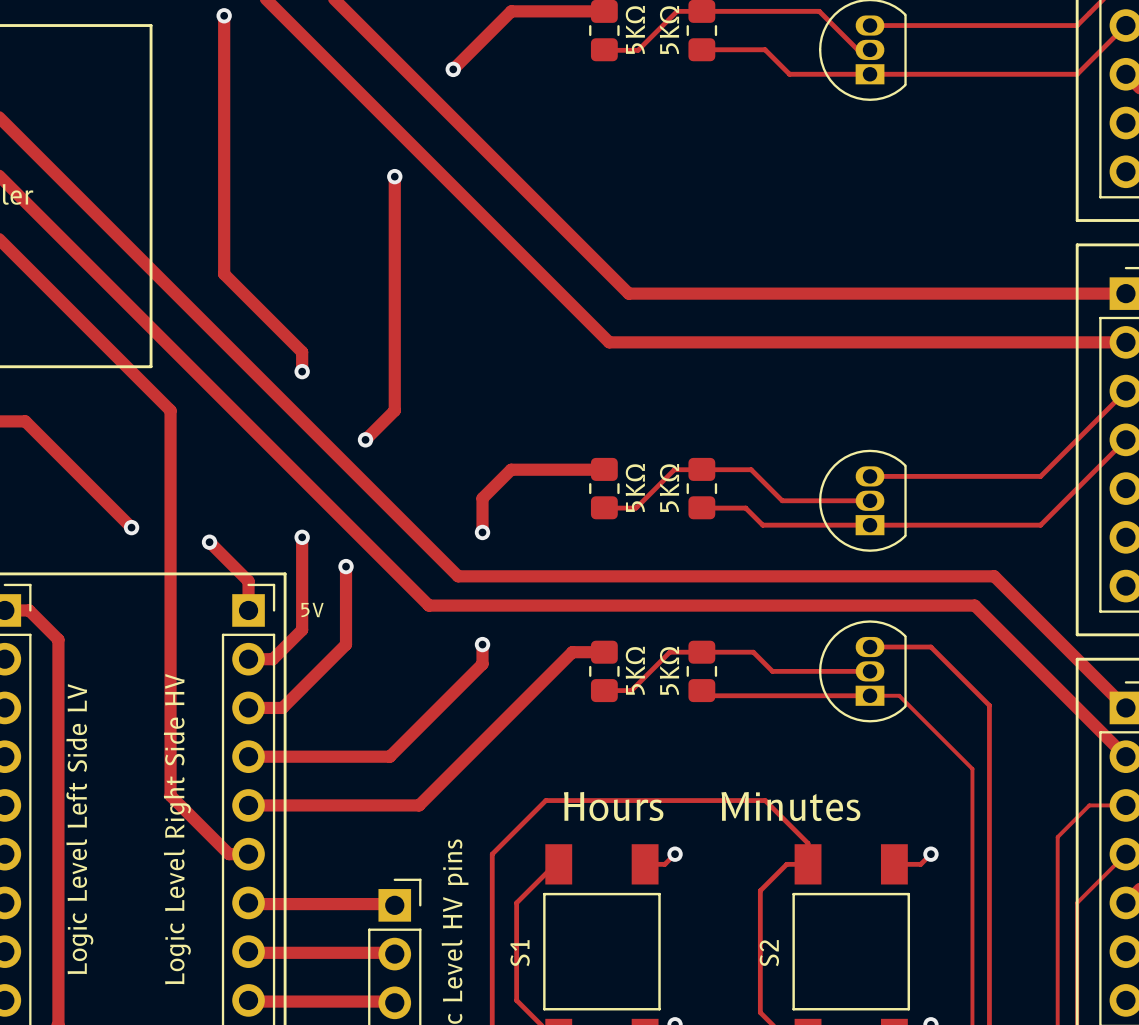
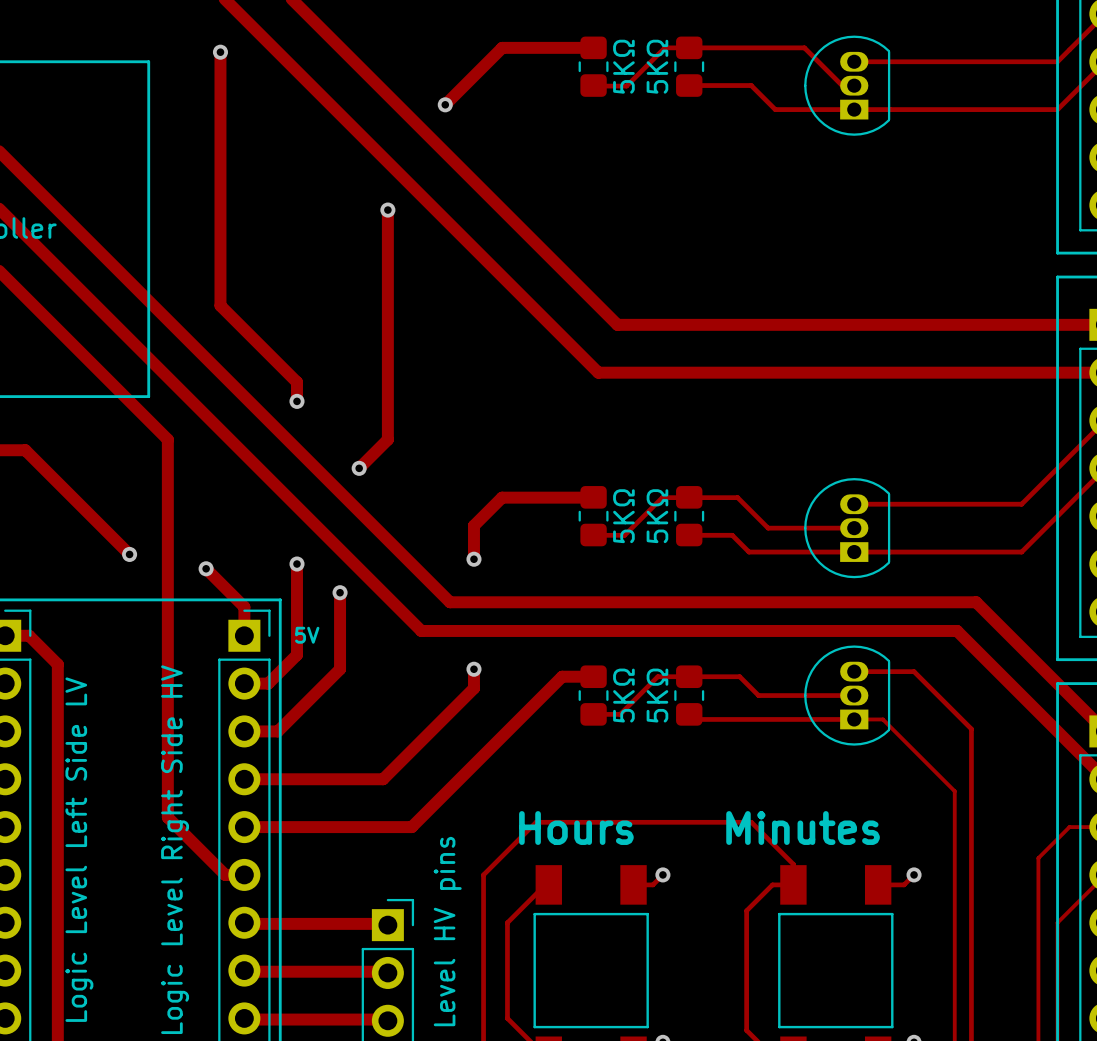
S1 name: S1 (520, 953) -> none
S2 name: S2 (769, 953) -> none

